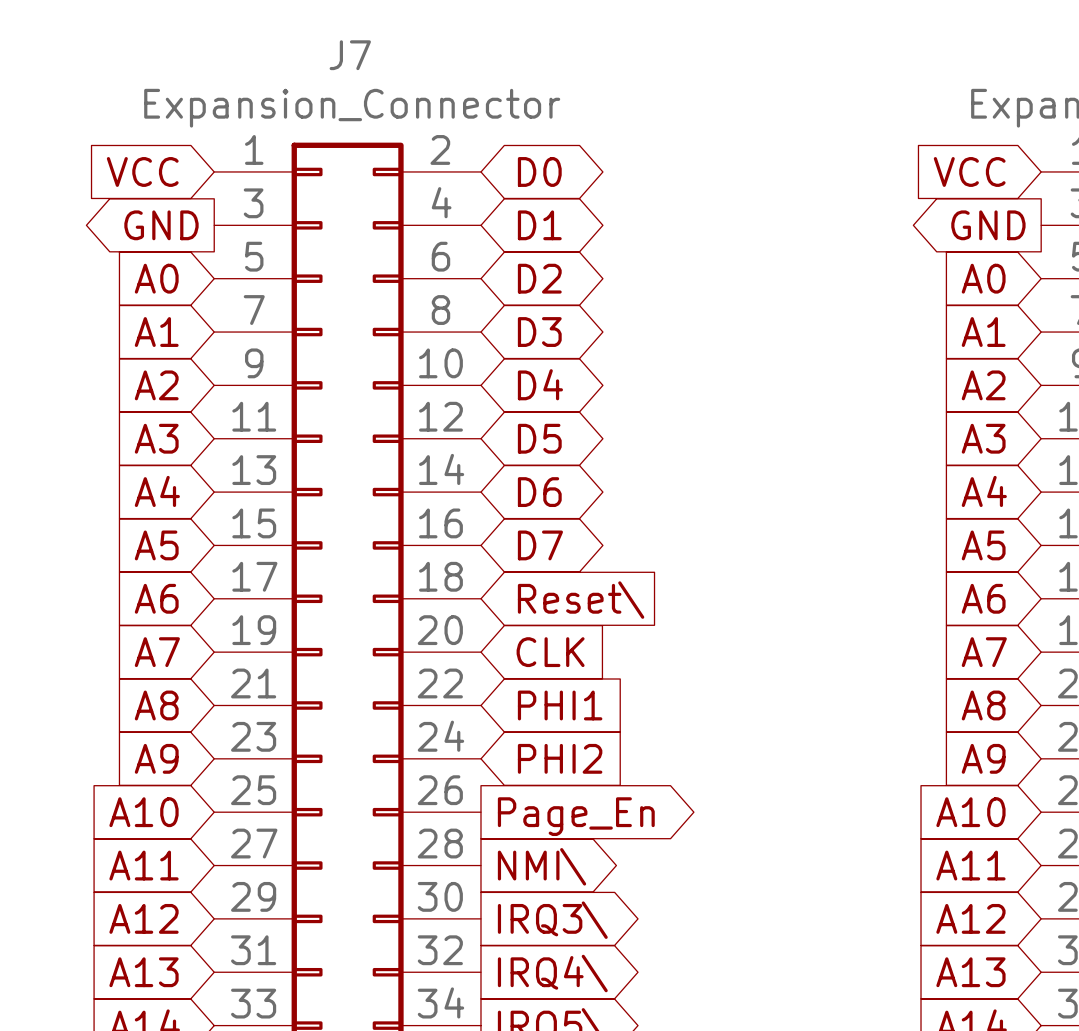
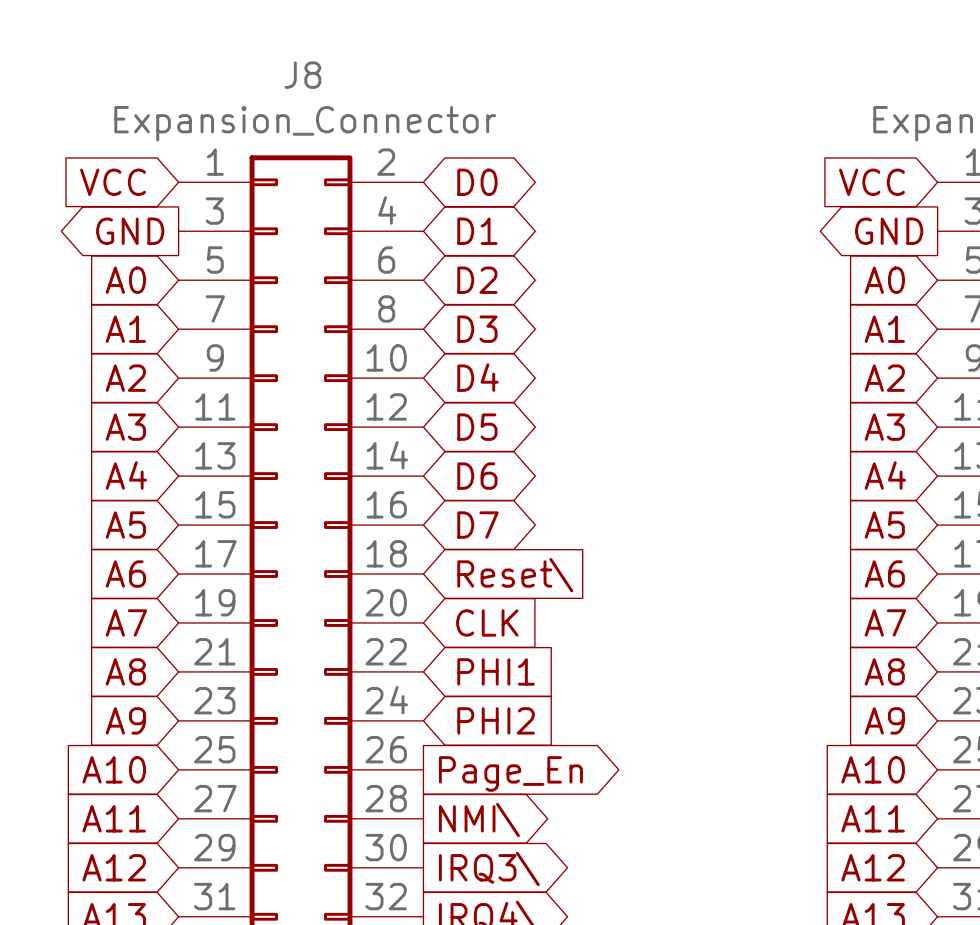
J7 name: J7 (350, 55) -> J8 (302, 75)

